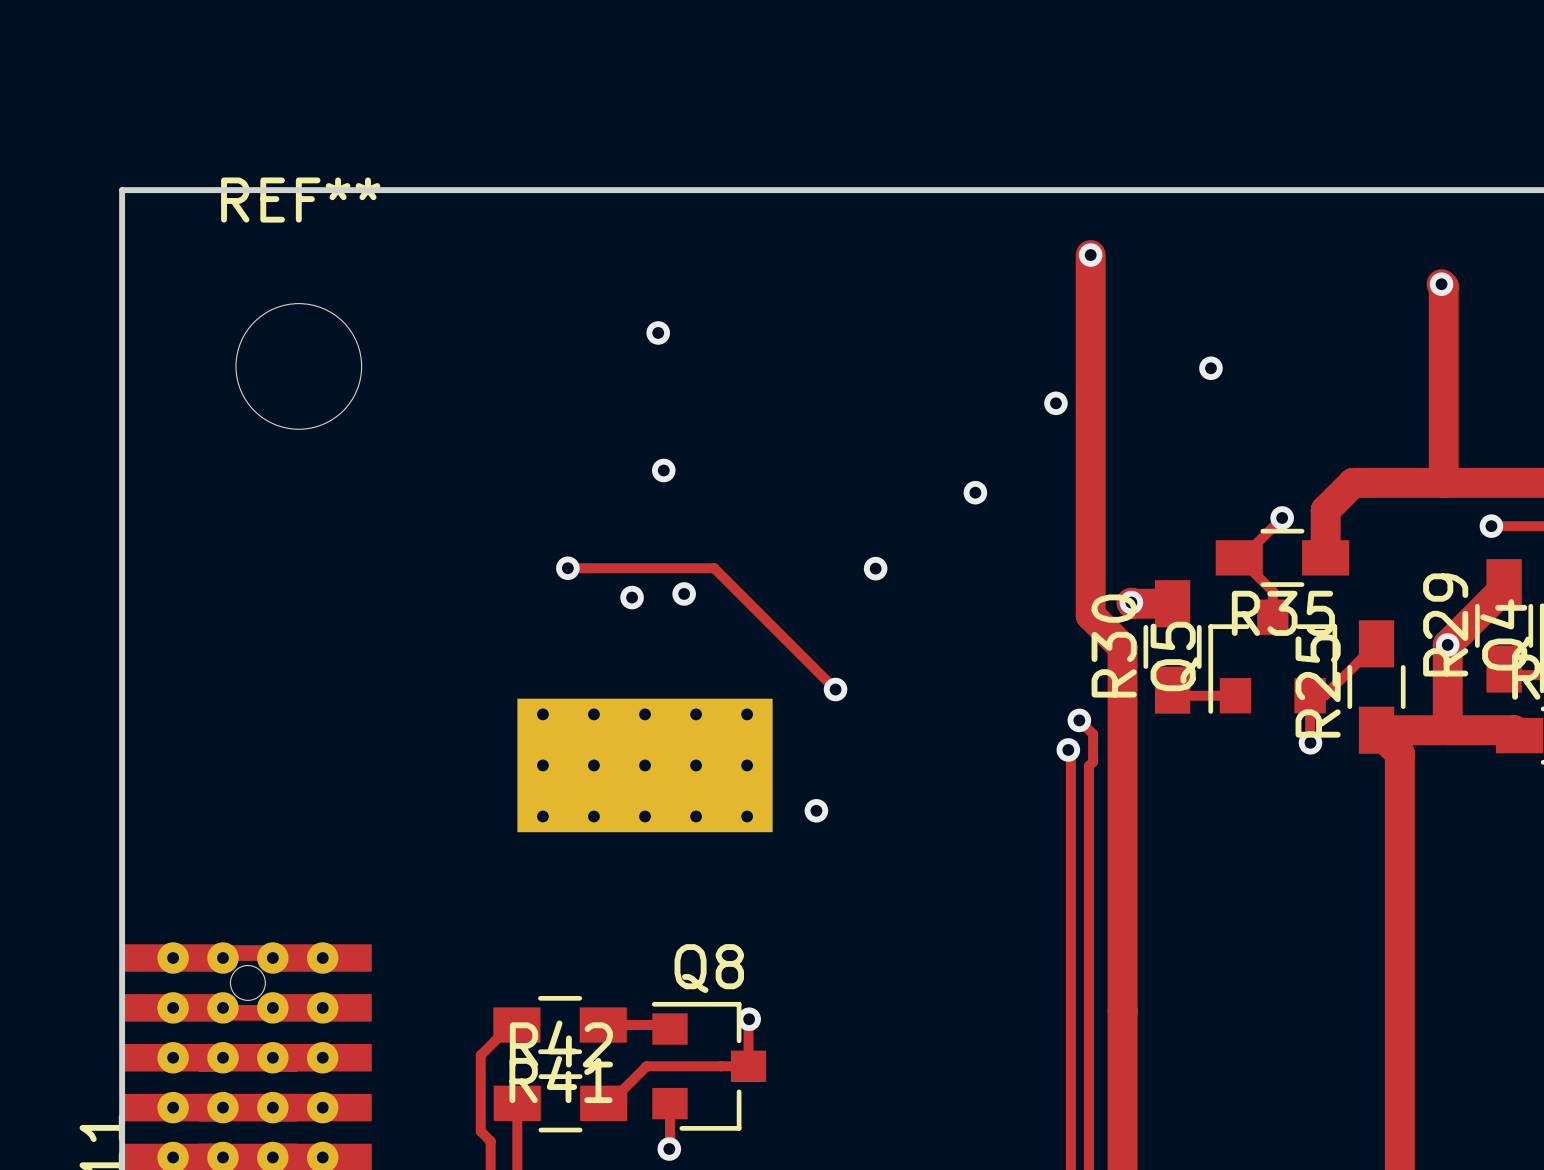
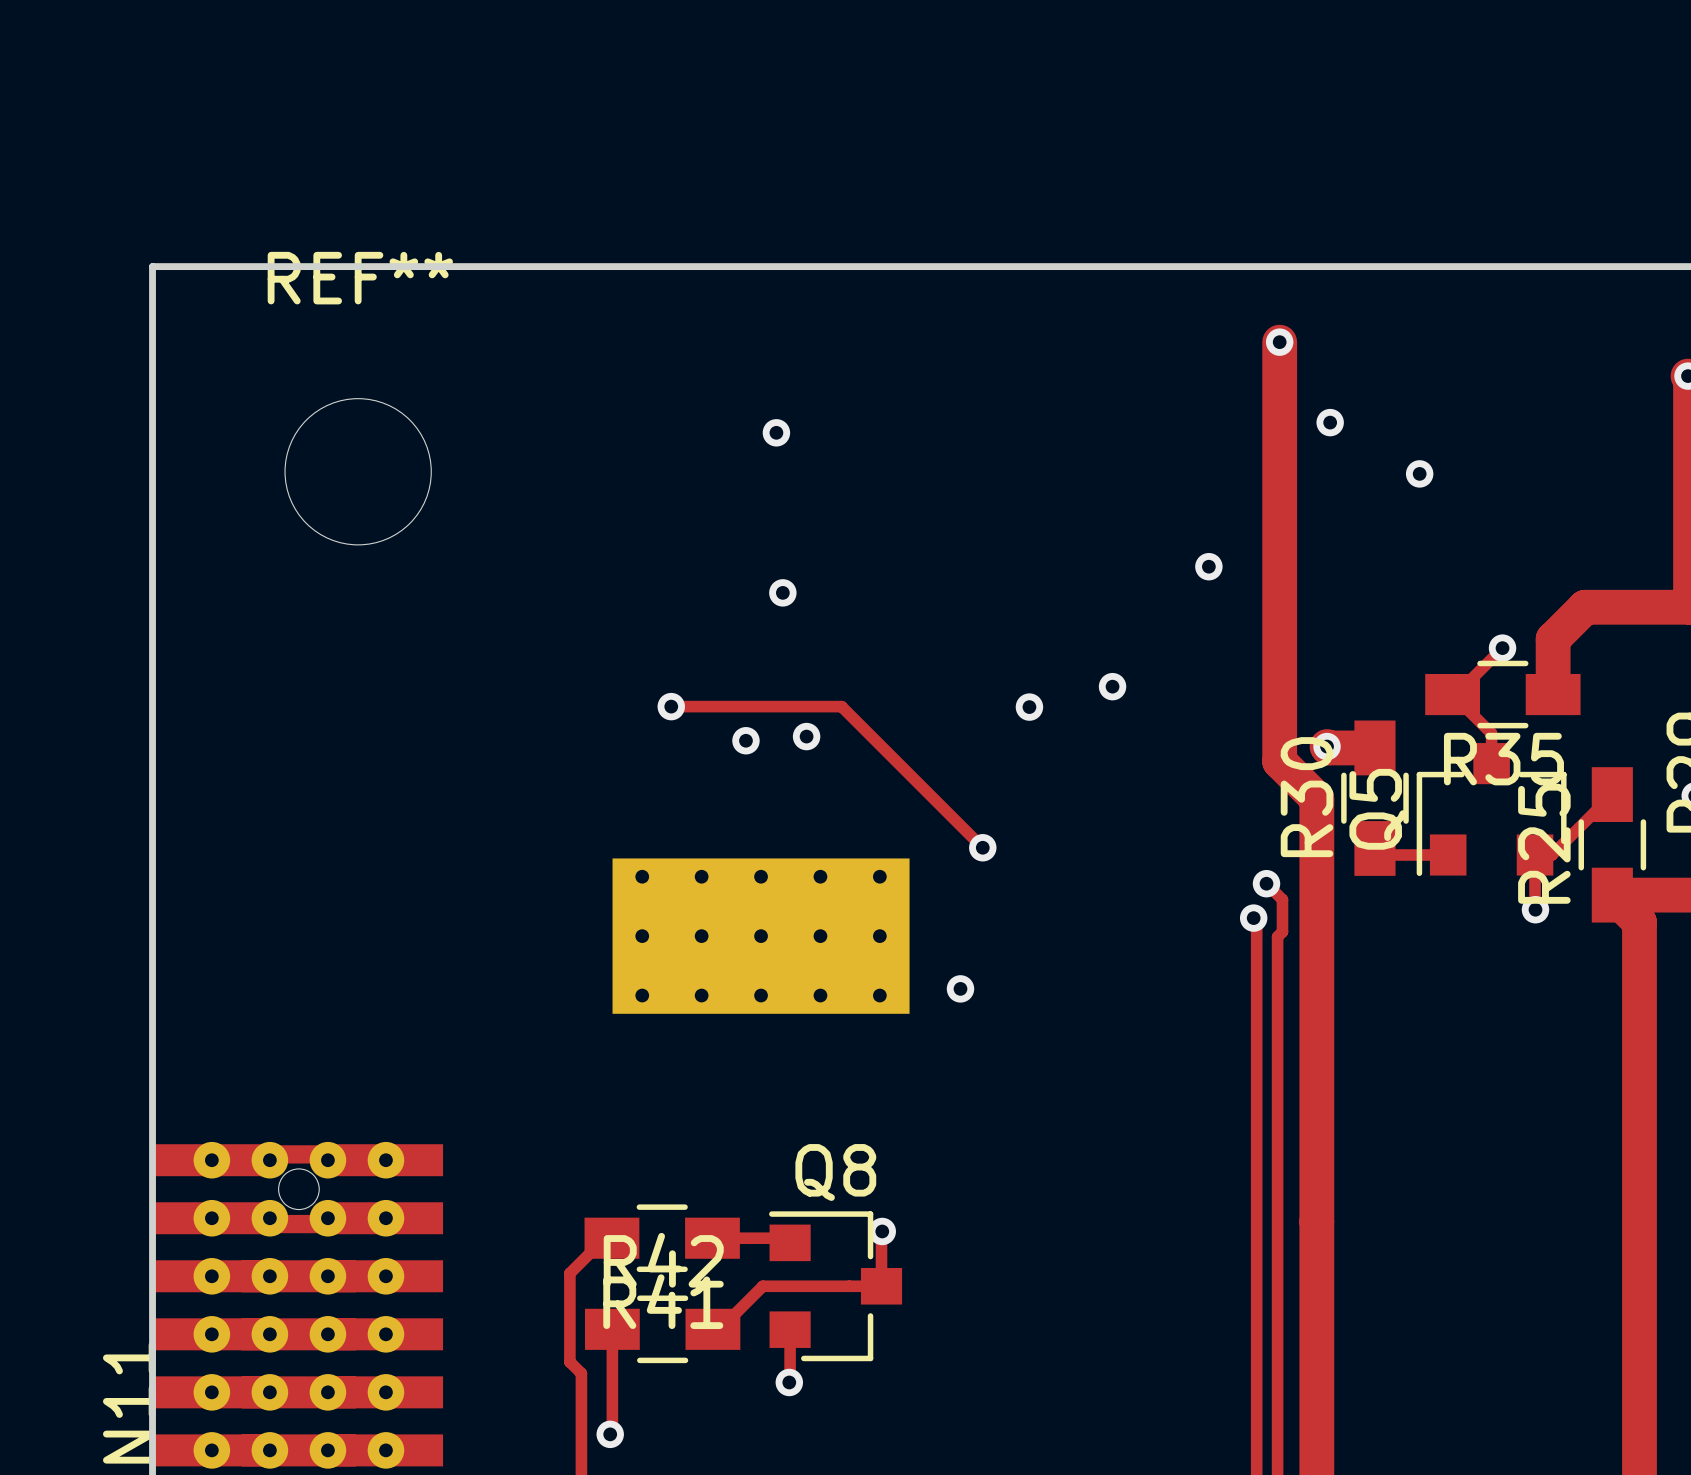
via: none -> (1330, 422)
via: (1055, 403) -> none
via: none -> (1208, 566)
via: (975, 492) -> none
via: none -> (1112, 686)

